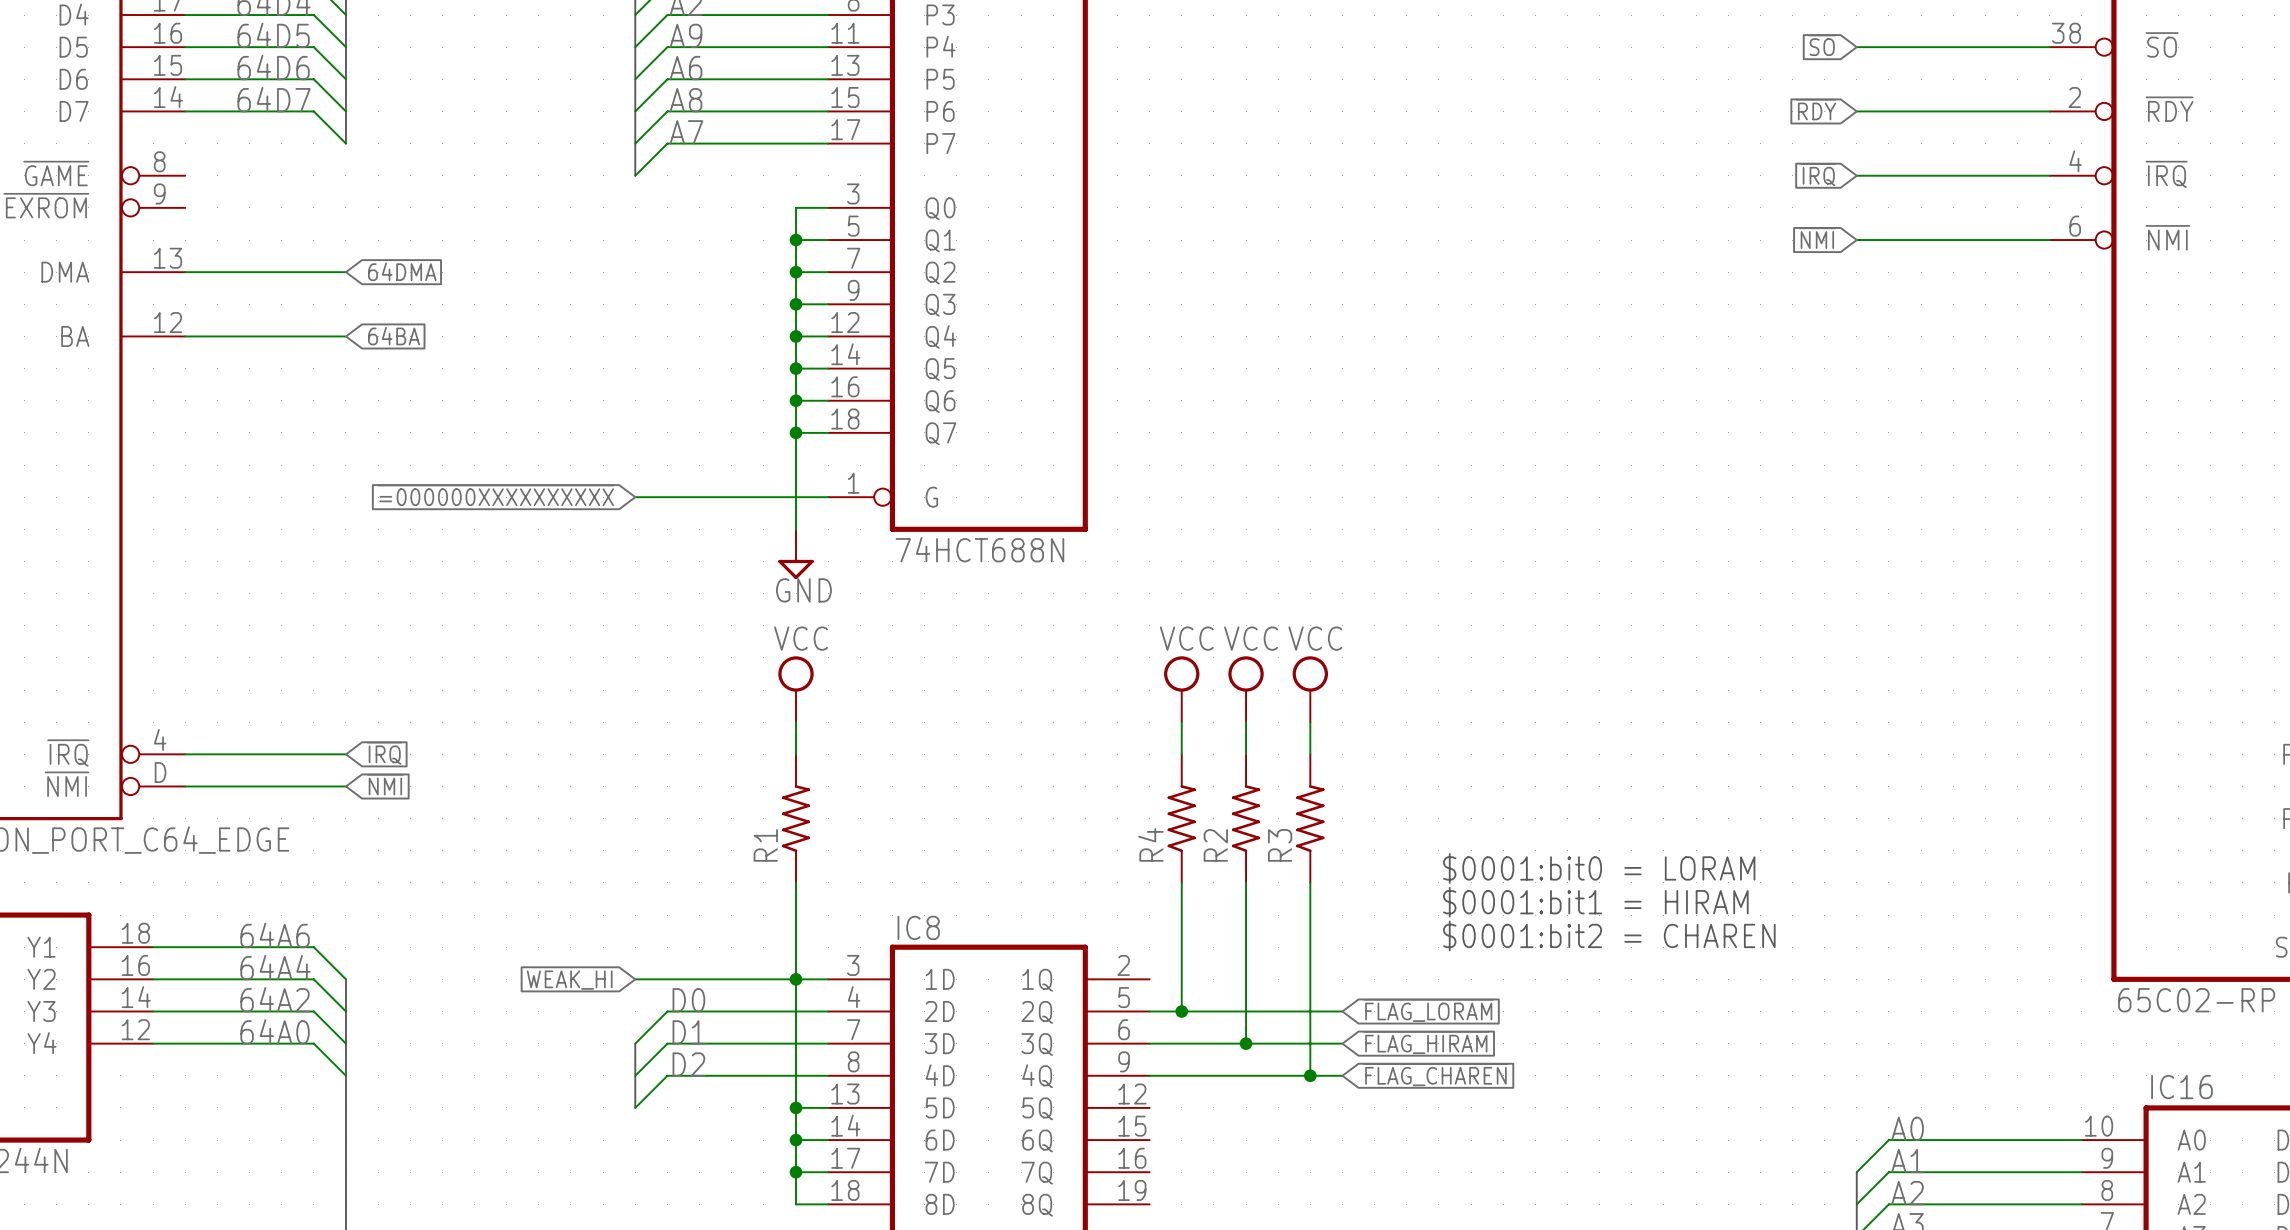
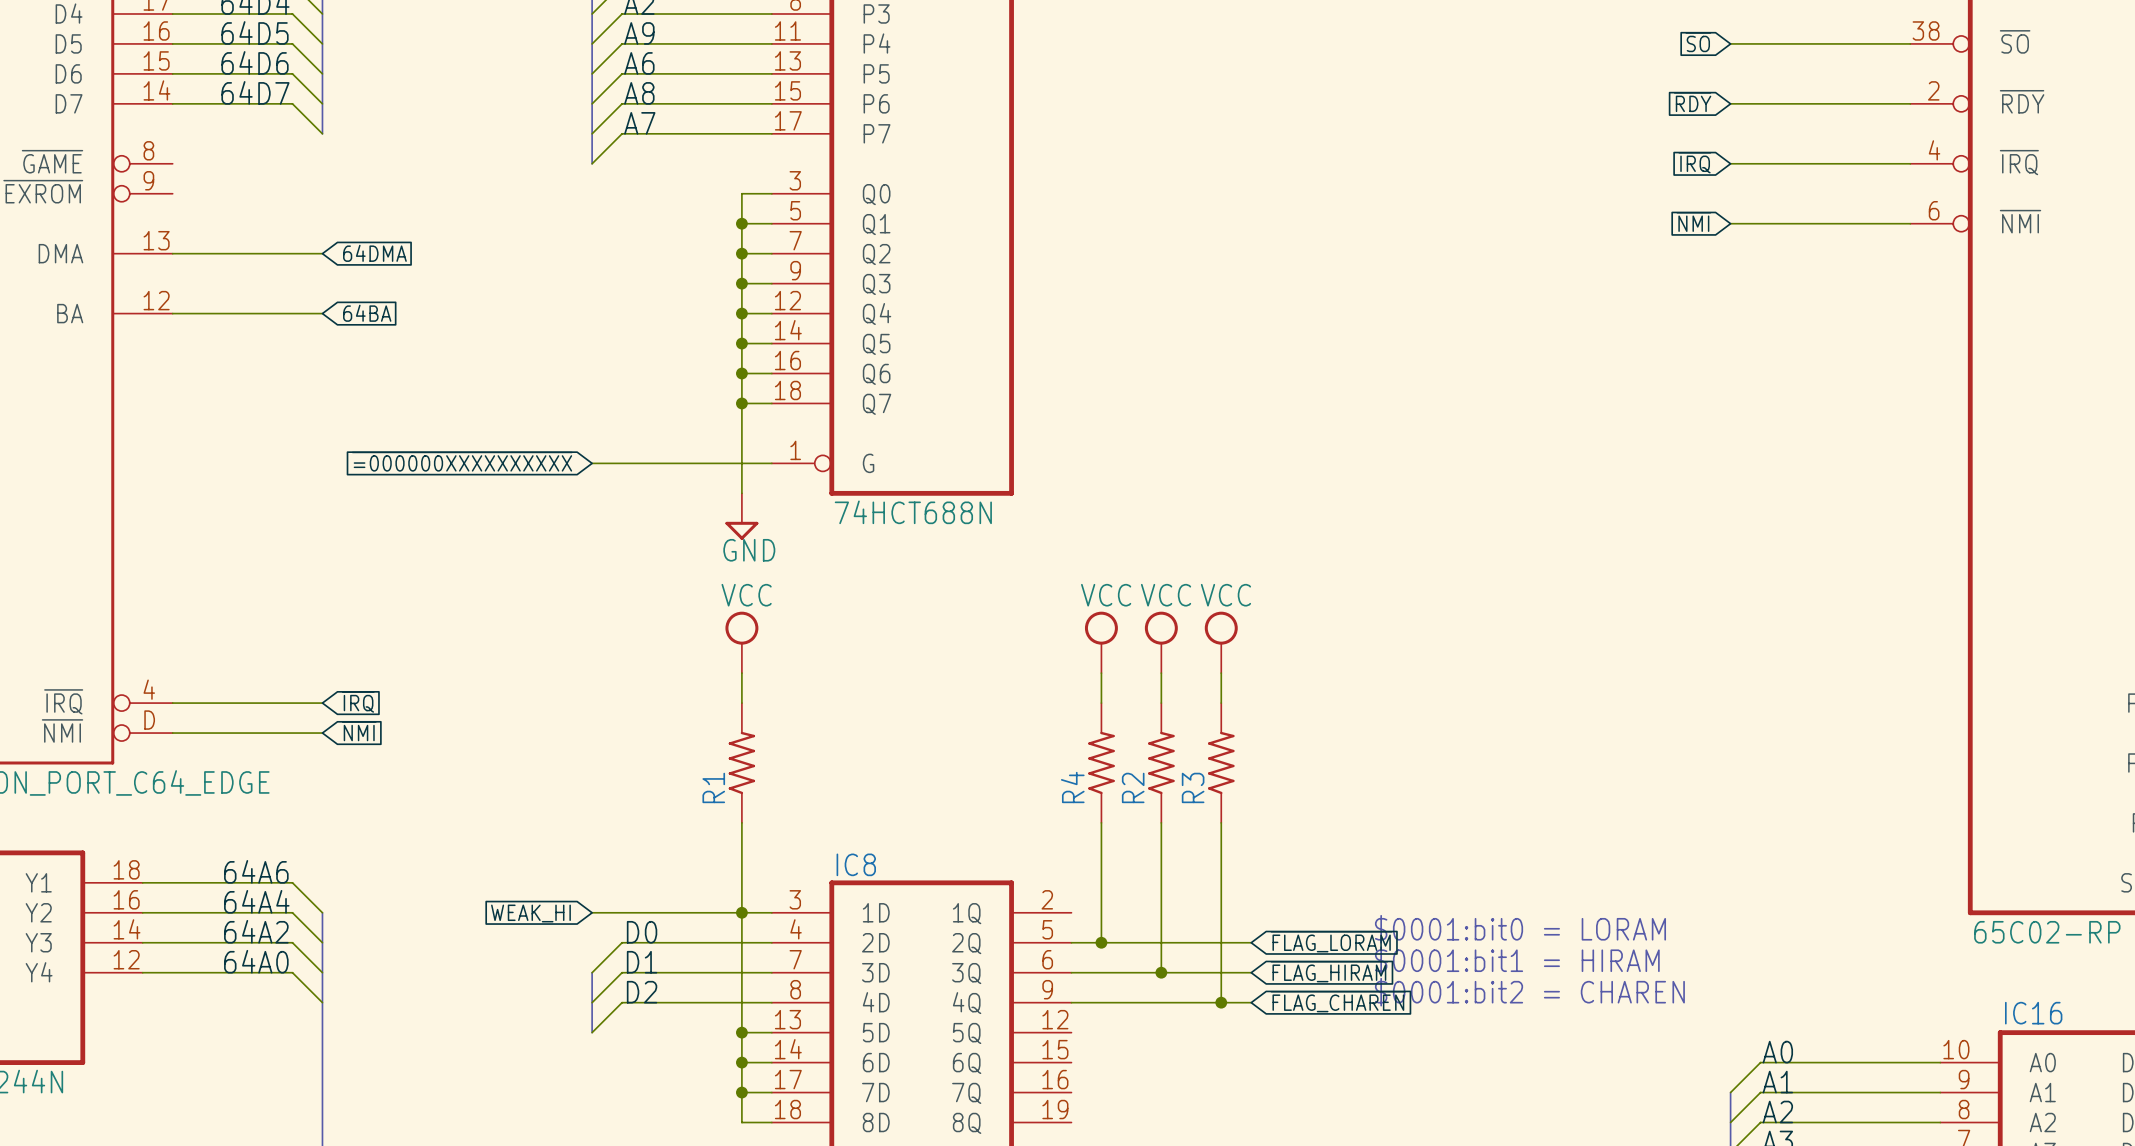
text position: $0001:bit0 = LORAM (1599, 868) -> $0001:bit0 = LORAM (1520, 929)
text position: $0001:bit1 = HIRAM (1595, 902) -> $0001:bit1 = HIRAM (1517, 960)
text position: $0001:bit2 = CHAREN (1609, 935) -> $0001:bit2 = CHAREN (1529, 992)

